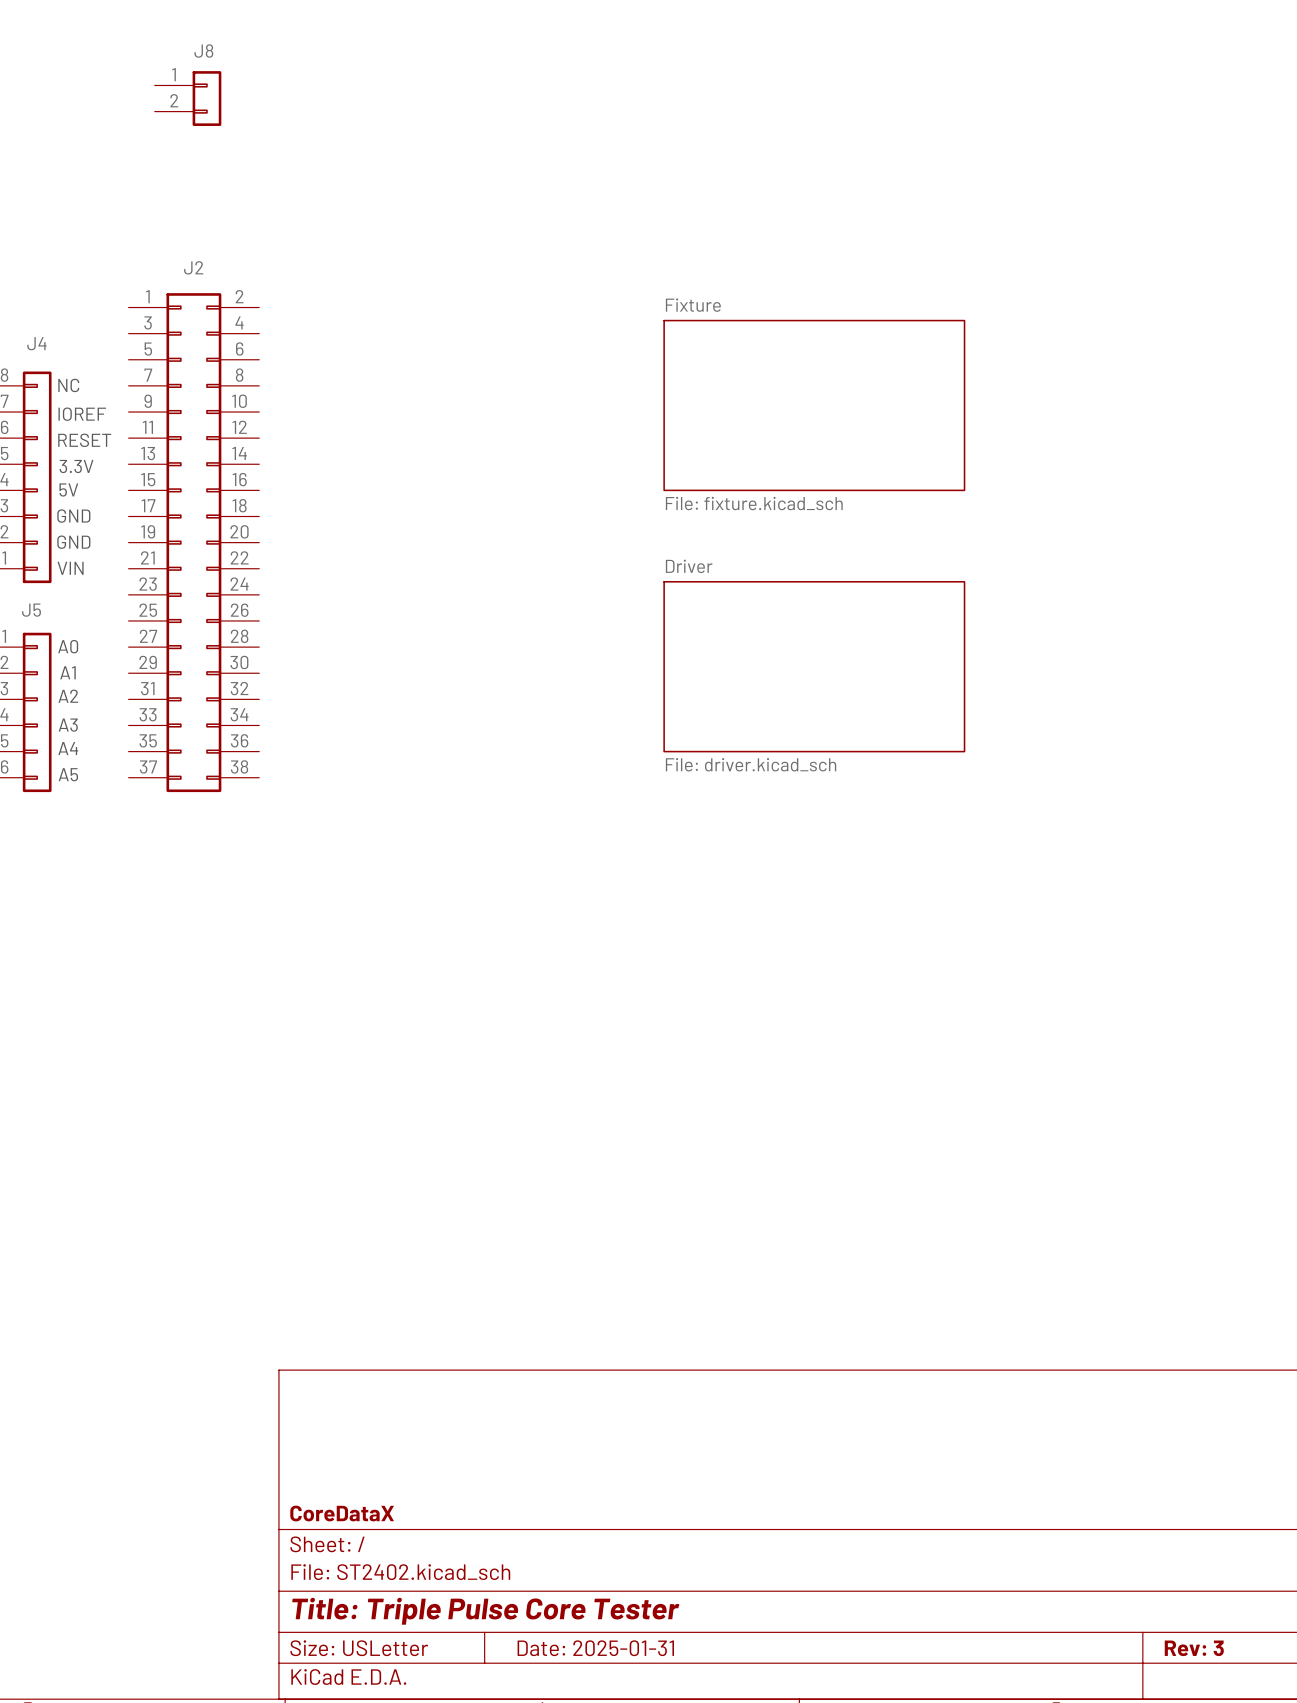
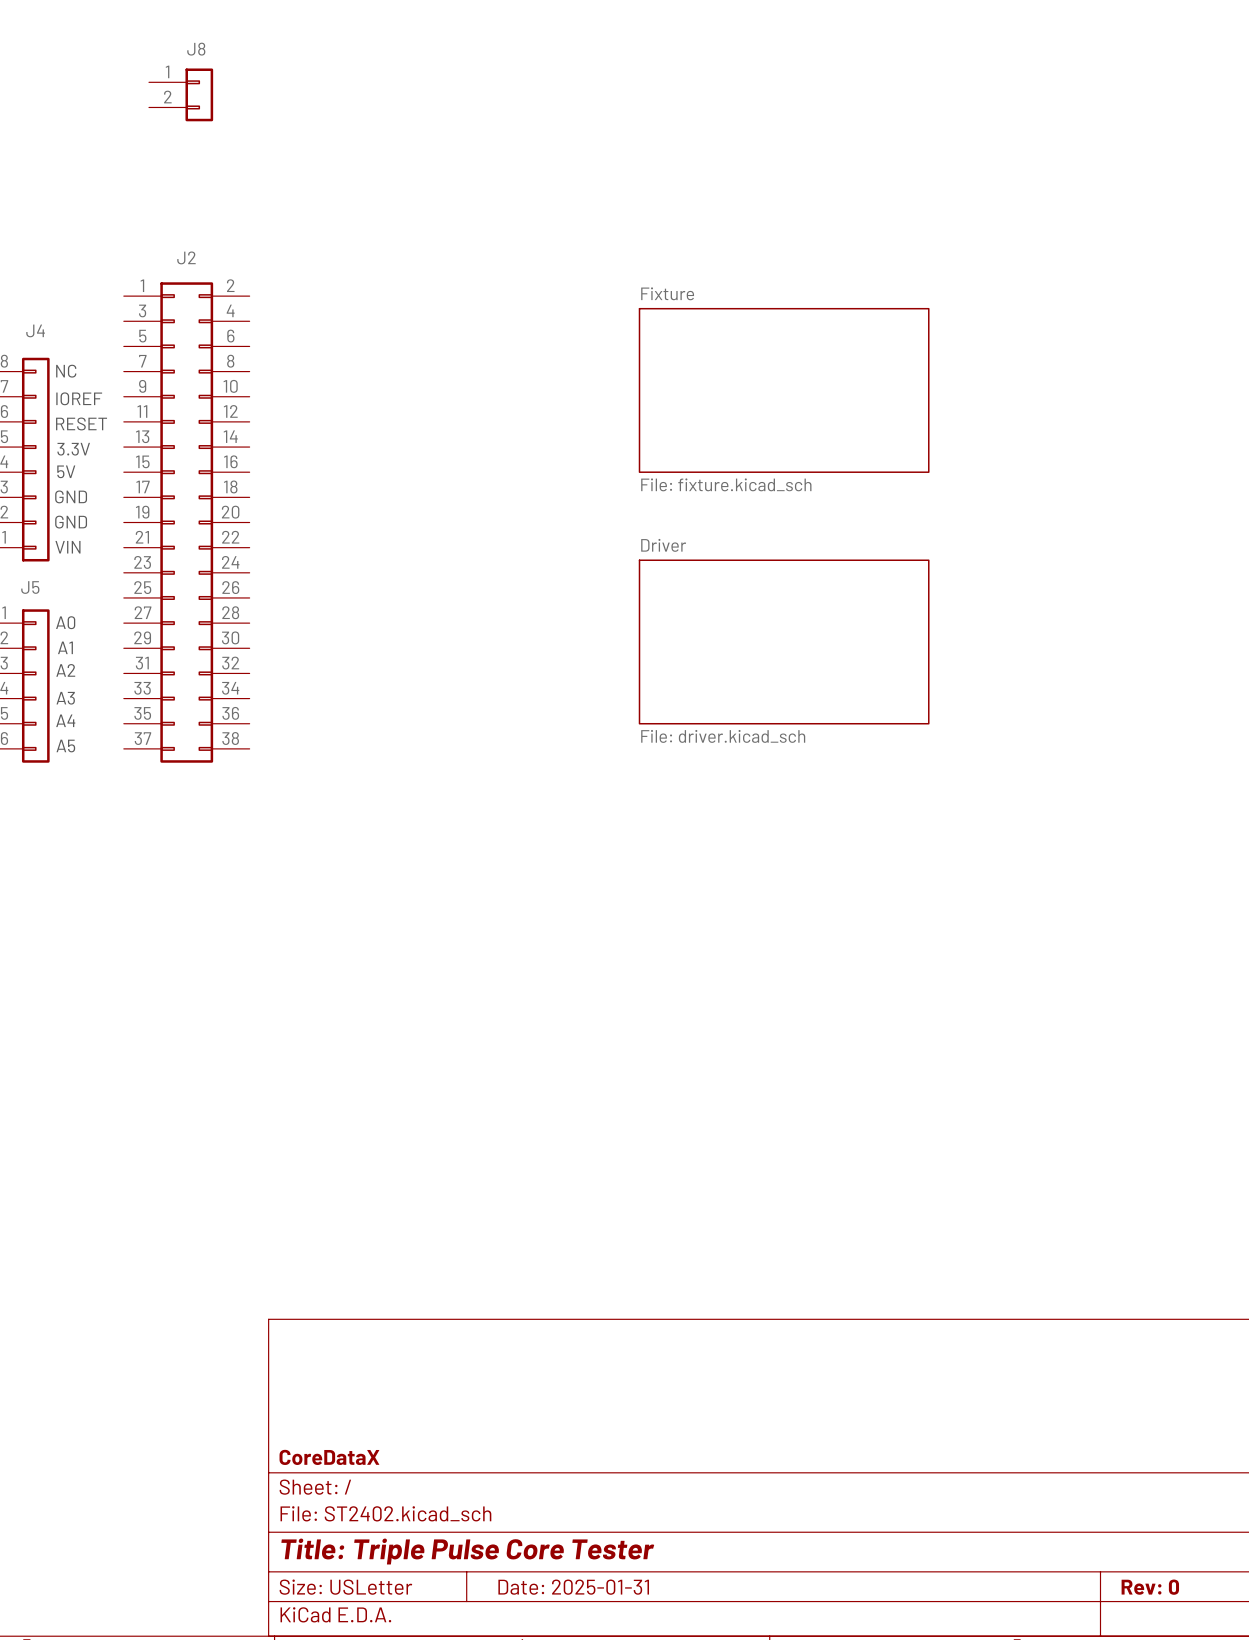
title block: Rev: 3 (1194, 1648) -> Rev: 0 (1150, 1587)

